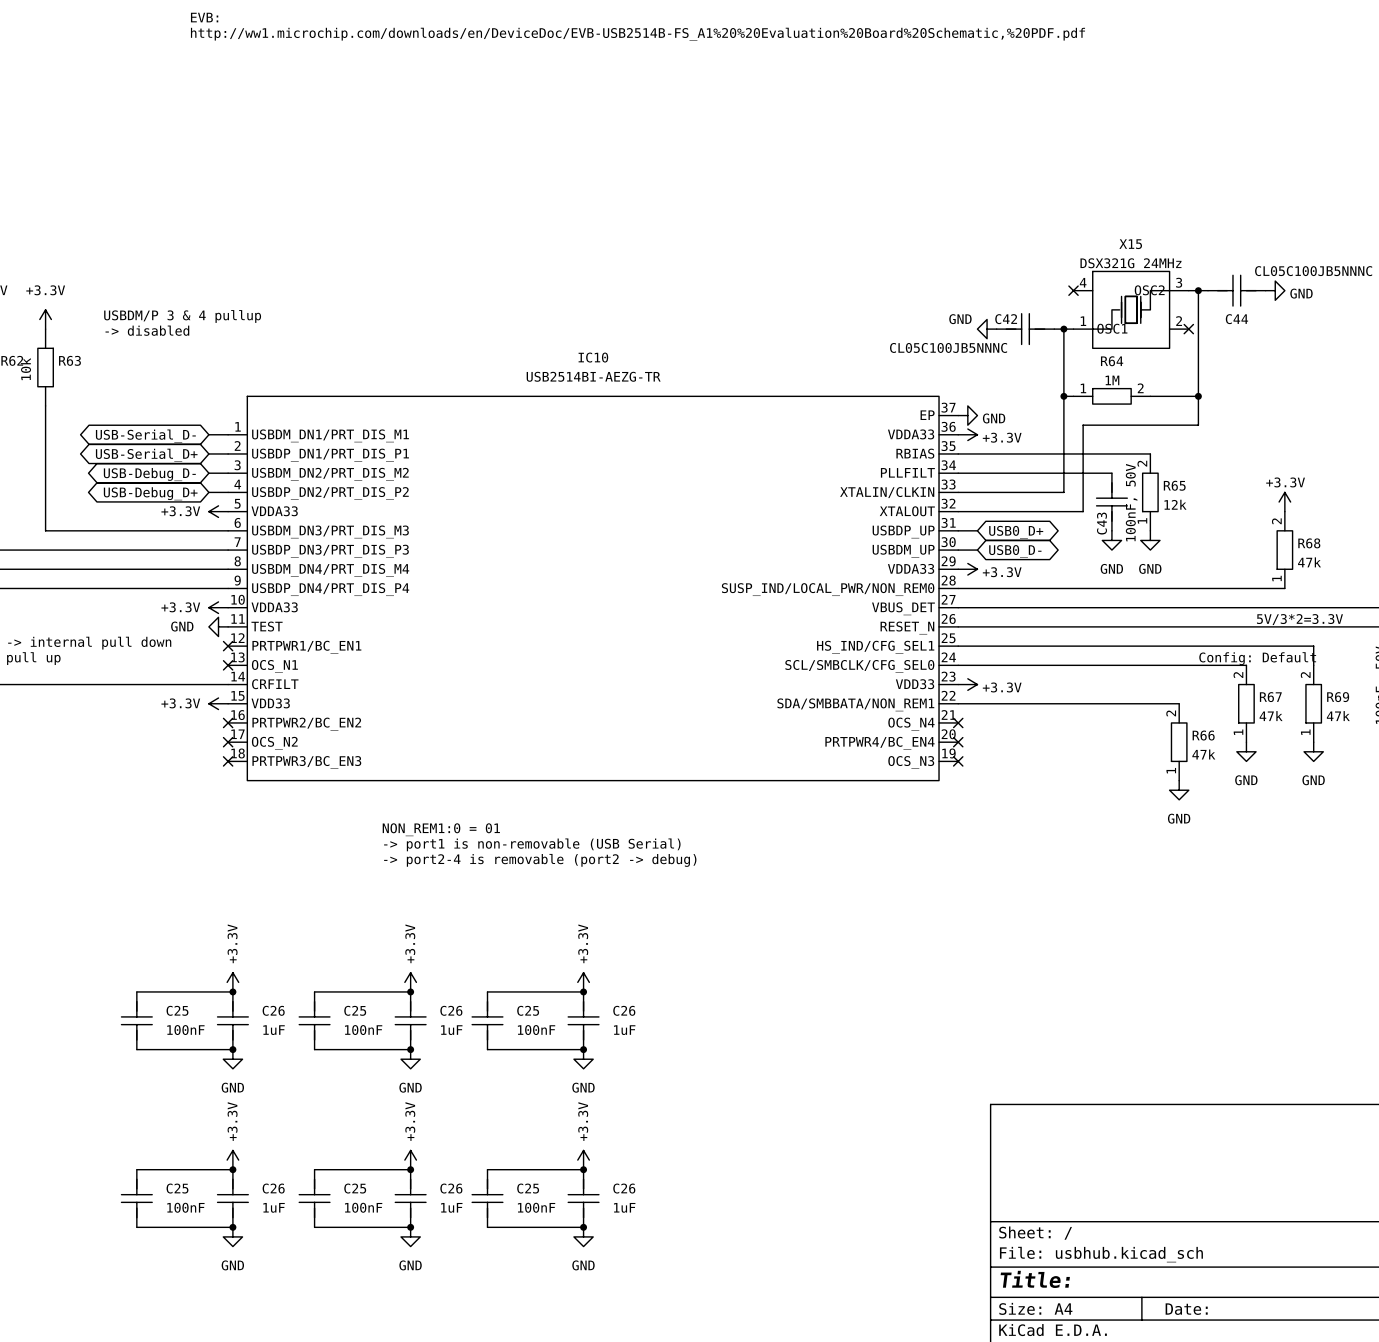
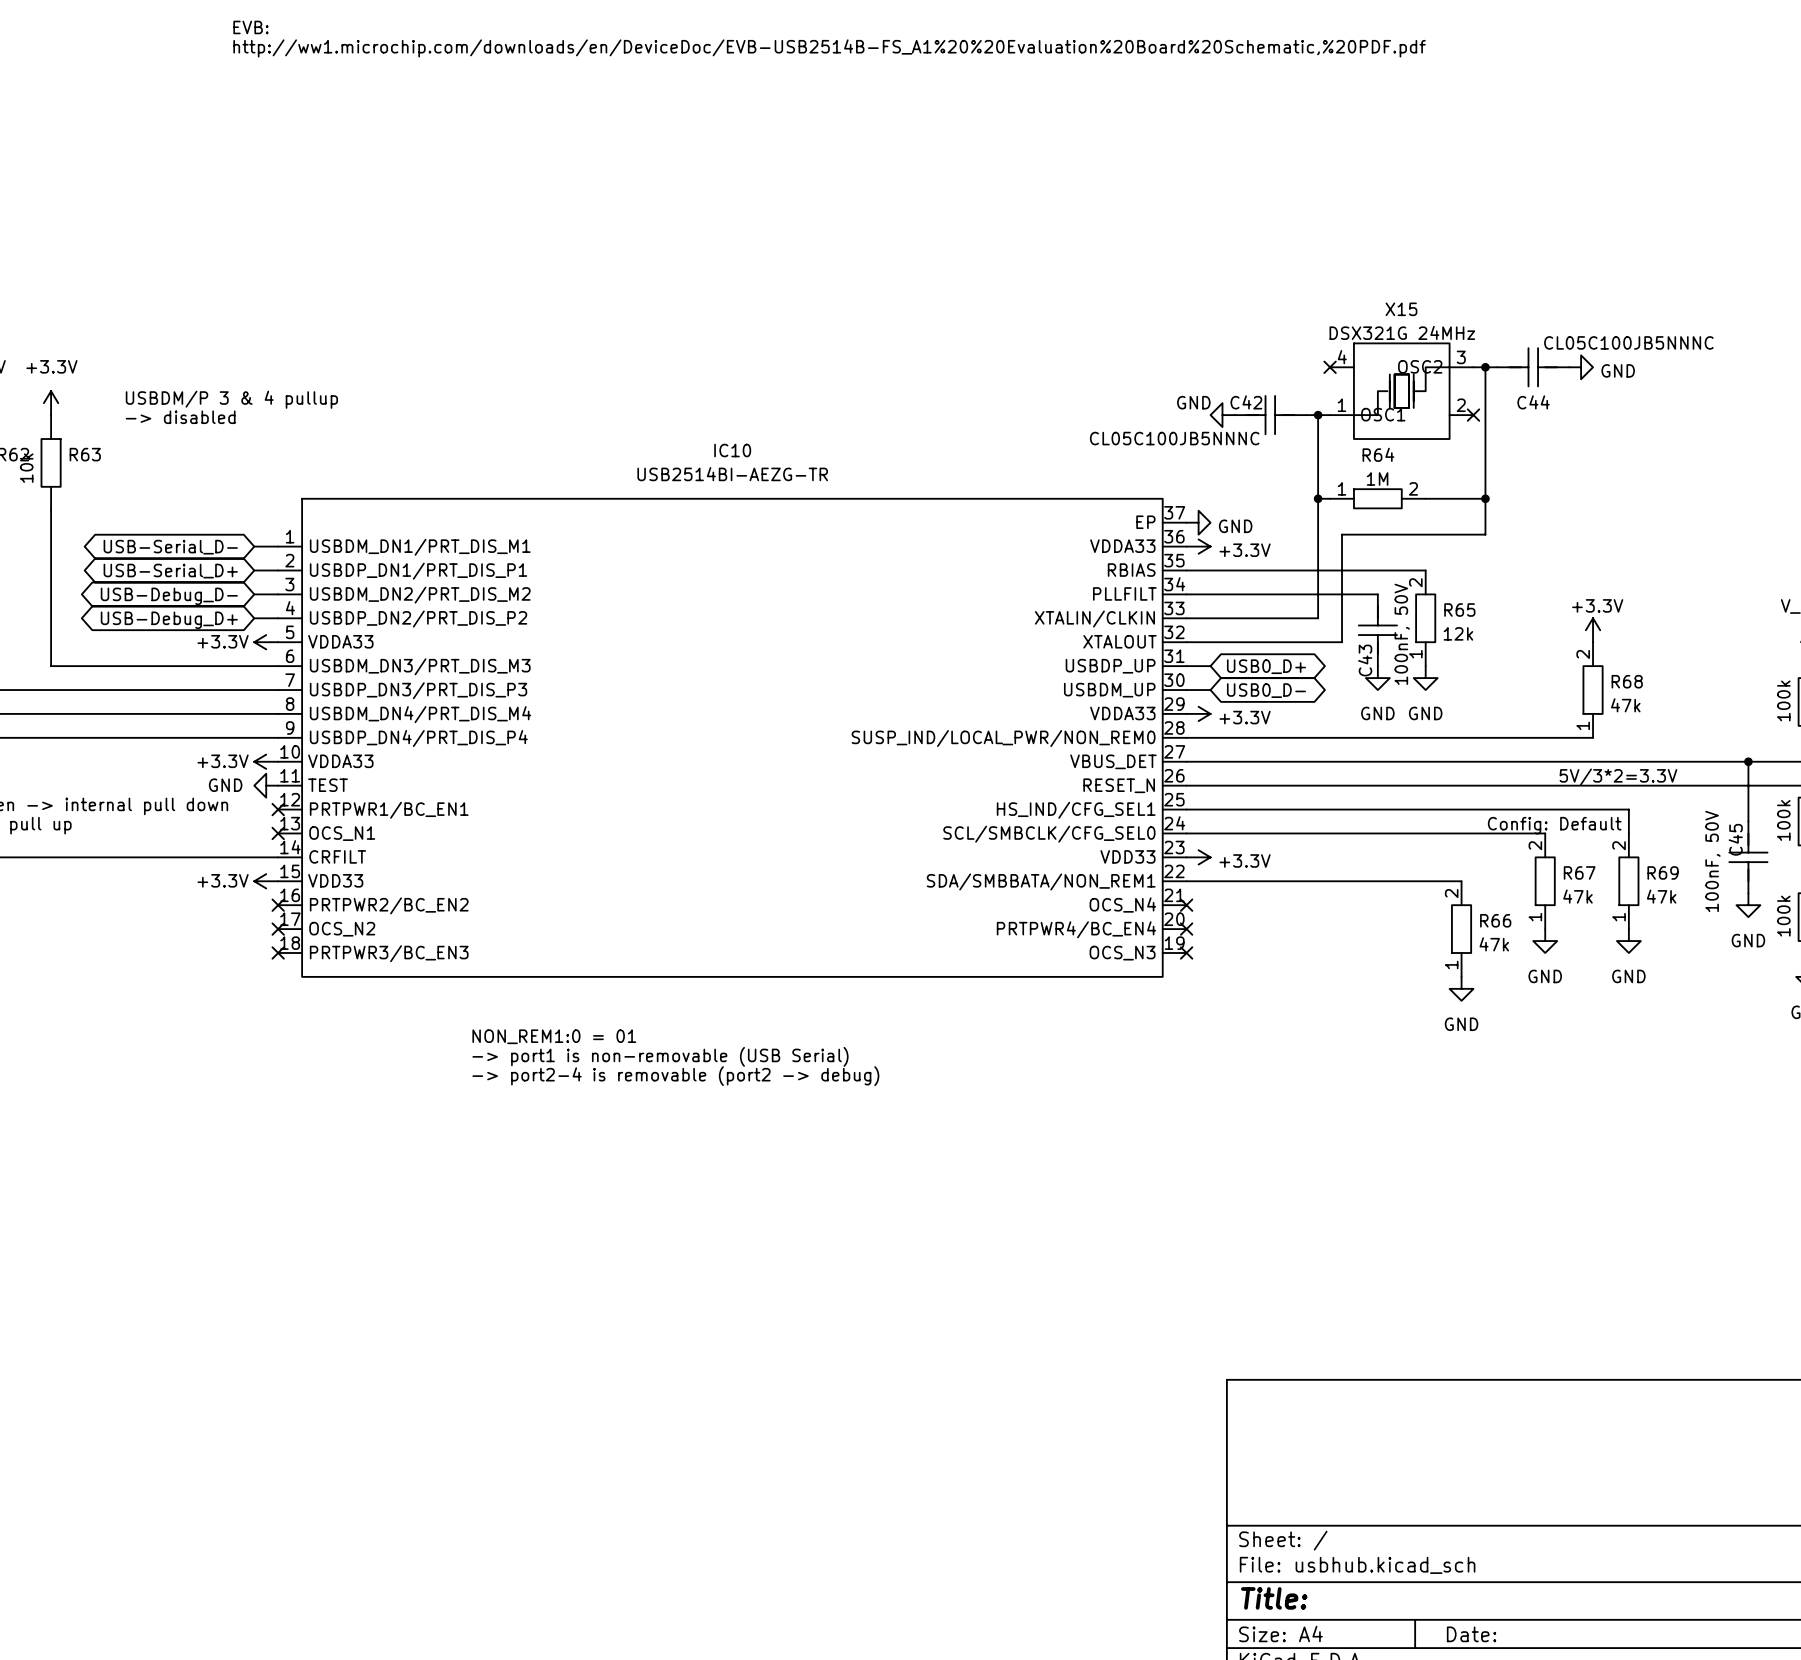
power symbol: +3.3V (232, 982) -> none
power symbol: +3.3V (410, 982) -> none
power symbol: +3.3V (583, 982) -> none
wire: (136, 991) (232, 991) -> none
junction: (232, 991) -> none
wire: (314, 991) (410, 991) -> none
junction: (410, 991) -> none
wire: (487, 991) (583, 991) -> none
junction: (583, 991) -> none
C25: 100nF (136, 1020) -> none
C26: 1uF (232, 1020) -> none
C25: 100nF (314, 1020) -> none
C26: 1uF (410, 1020) -> none
C25: 100nF (487, 1020) -> none
C26: 1uF (583, 1020) -> none
wire: (136, 1049) (232, 1049) -> none
junction: (232, 1049) -> none
wire: (314, 1049) (410, 1049) -> none
junction: (410, 1049) -> none
wire: (487, 1049) (583, 1049) -> none
junction: (583, 1049) -> none
power symbol: GND (232, 1059) -> none
power symbol: GND (410, 1059) -> none
power symbol: GND (583, 1059) -> none
power symbol: +3.3V (232, 1160) -> none
power symbol: +3.3V (410, 1160) -> none
power symbol: +3.3V (583, 1160) -> none
wire: (136, 1169) (232, 1169) -> none
junction: (232, 1169) -> none
wire: (314, 1169) (410, 1169) -> none
junction: (410, 1169) -> none
wire: (487, 1169) (583, 1169) -> none
junction: (583, 1169) -> none
C25: 100nF (136, 1198) -> none
C26: 1uF (232, 1198) -> none
C25: 100nF (314, 1198) -> none
C26: 1uF (410, 1198) -> none
C25: 100nF (487, 1198) -> none
C26: 1uF (583, 1198) -> none
wire: (136, 1227) (232, 1227) -> none
junction: (232, 1227) -> none
wire: (314, 1227) (410, 1227) -> none
junction: (410, 1227) -> none
wire: (487, 1227) (583, 1227) -> none
junction: (583, 1227) -> none
power symbol: GND (232, 1236) -> none
power symbol: GND (410, 1236) -> none
power symbol: GND (583, 1236) -> none

